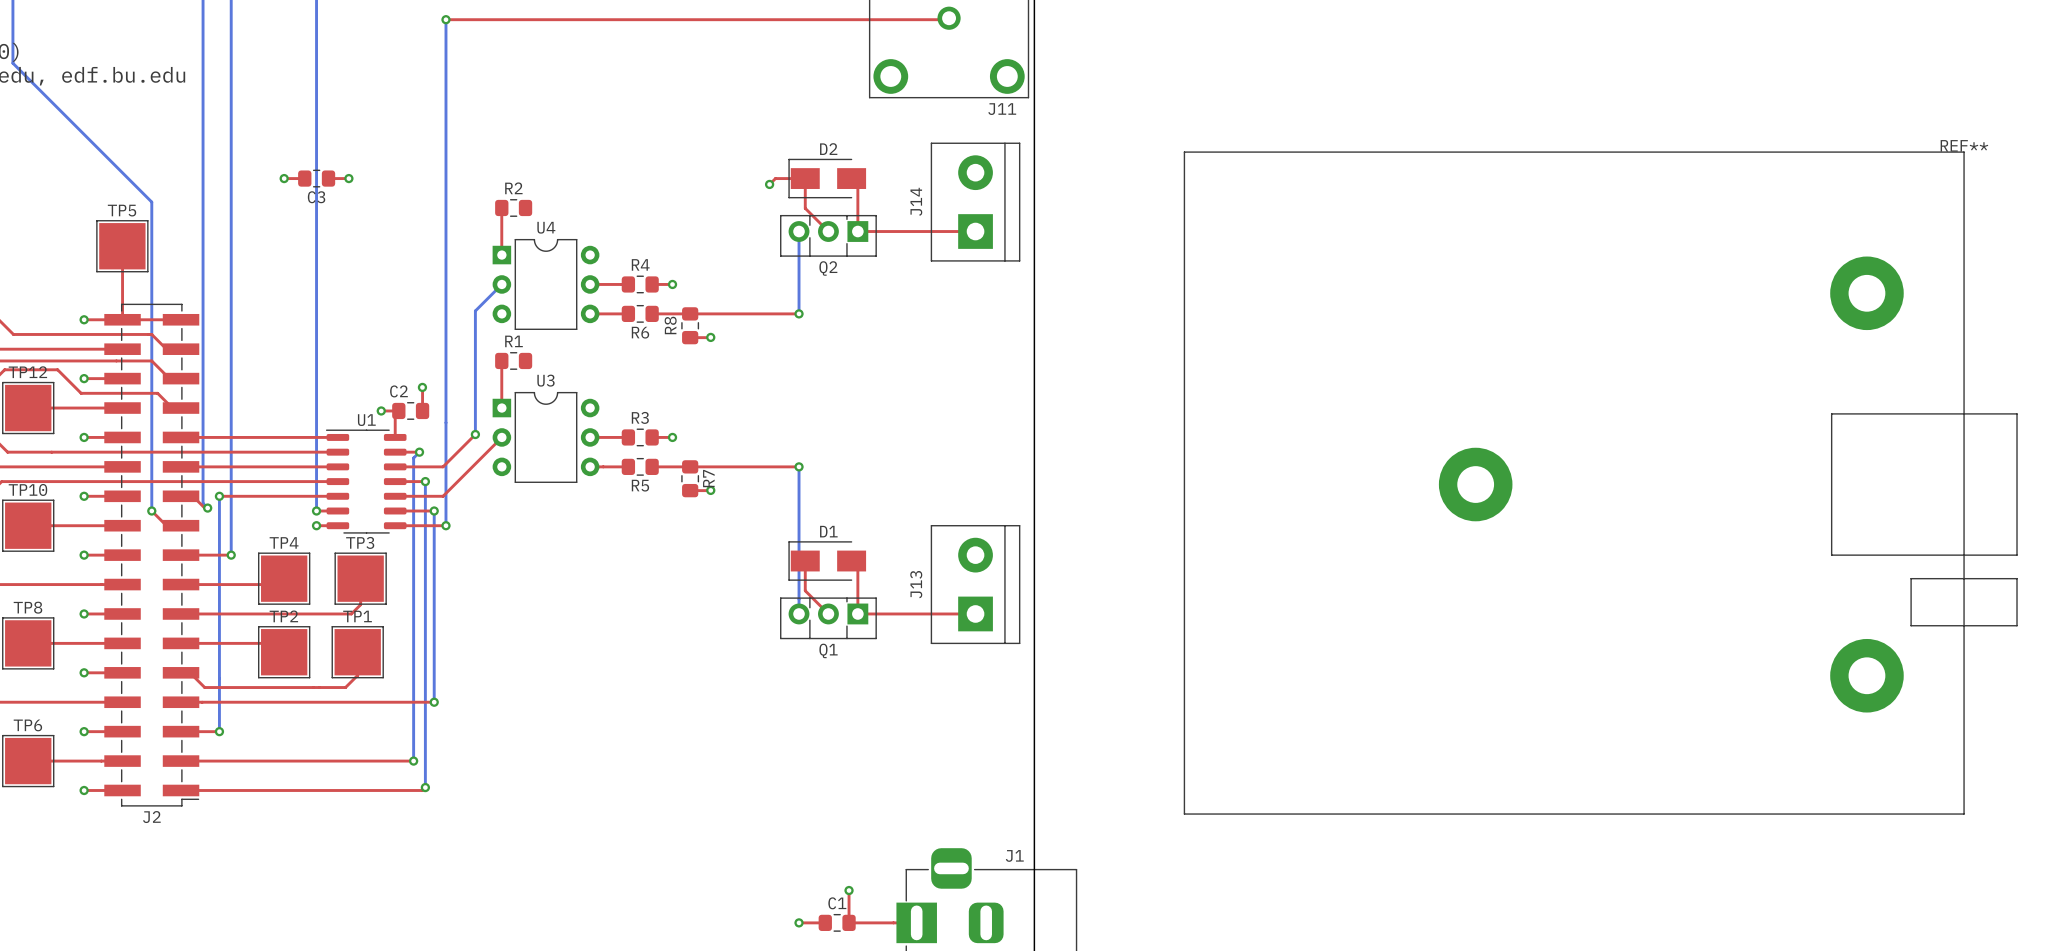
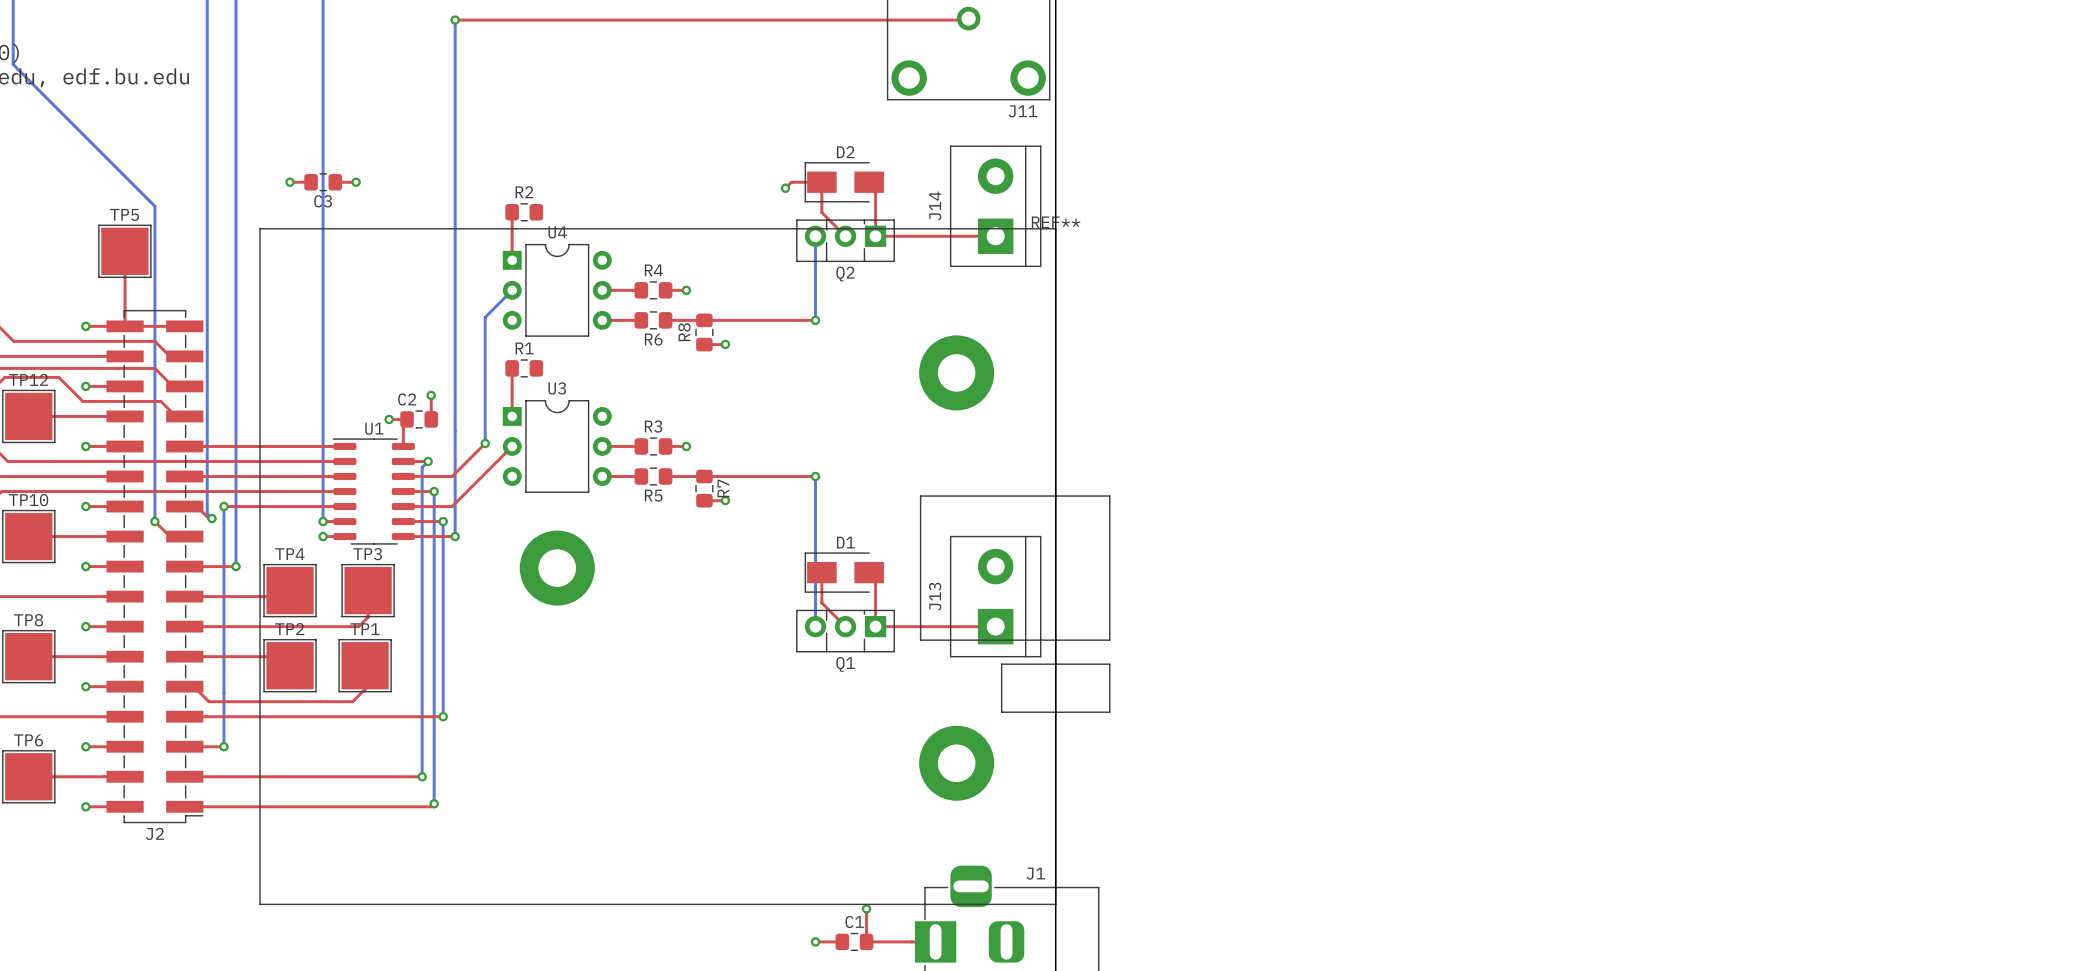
REF**: (1600, 483) -> none
REF**: none -> (684, 566)

